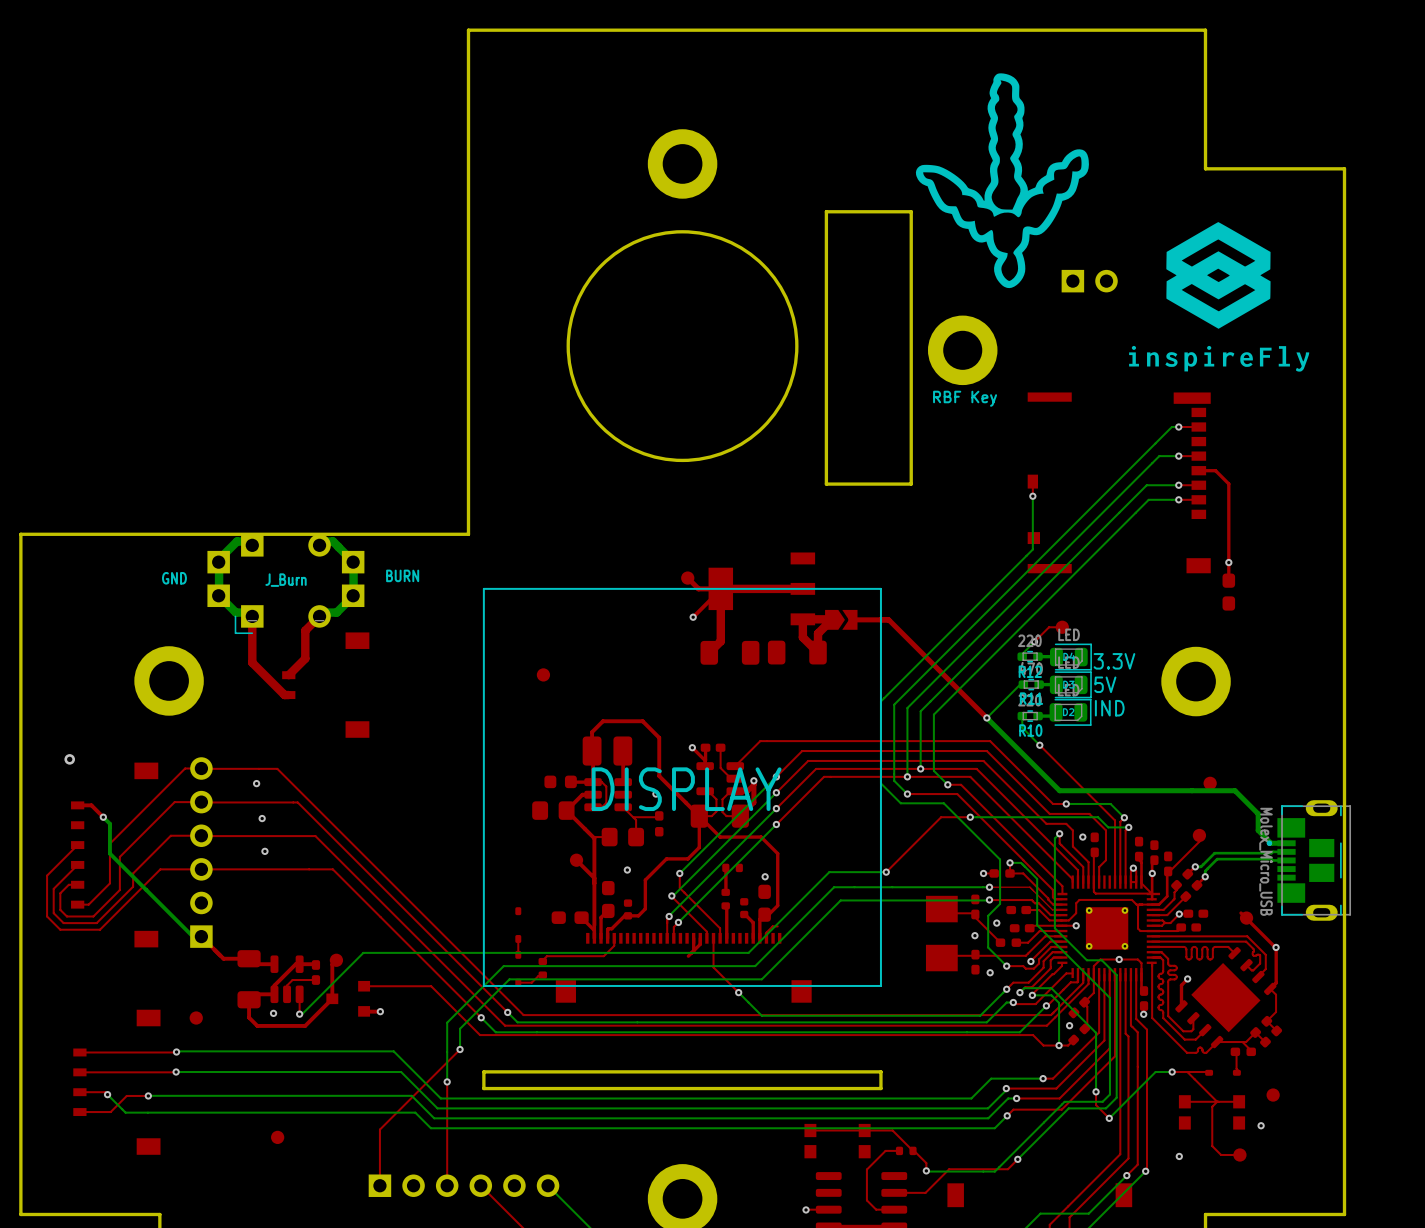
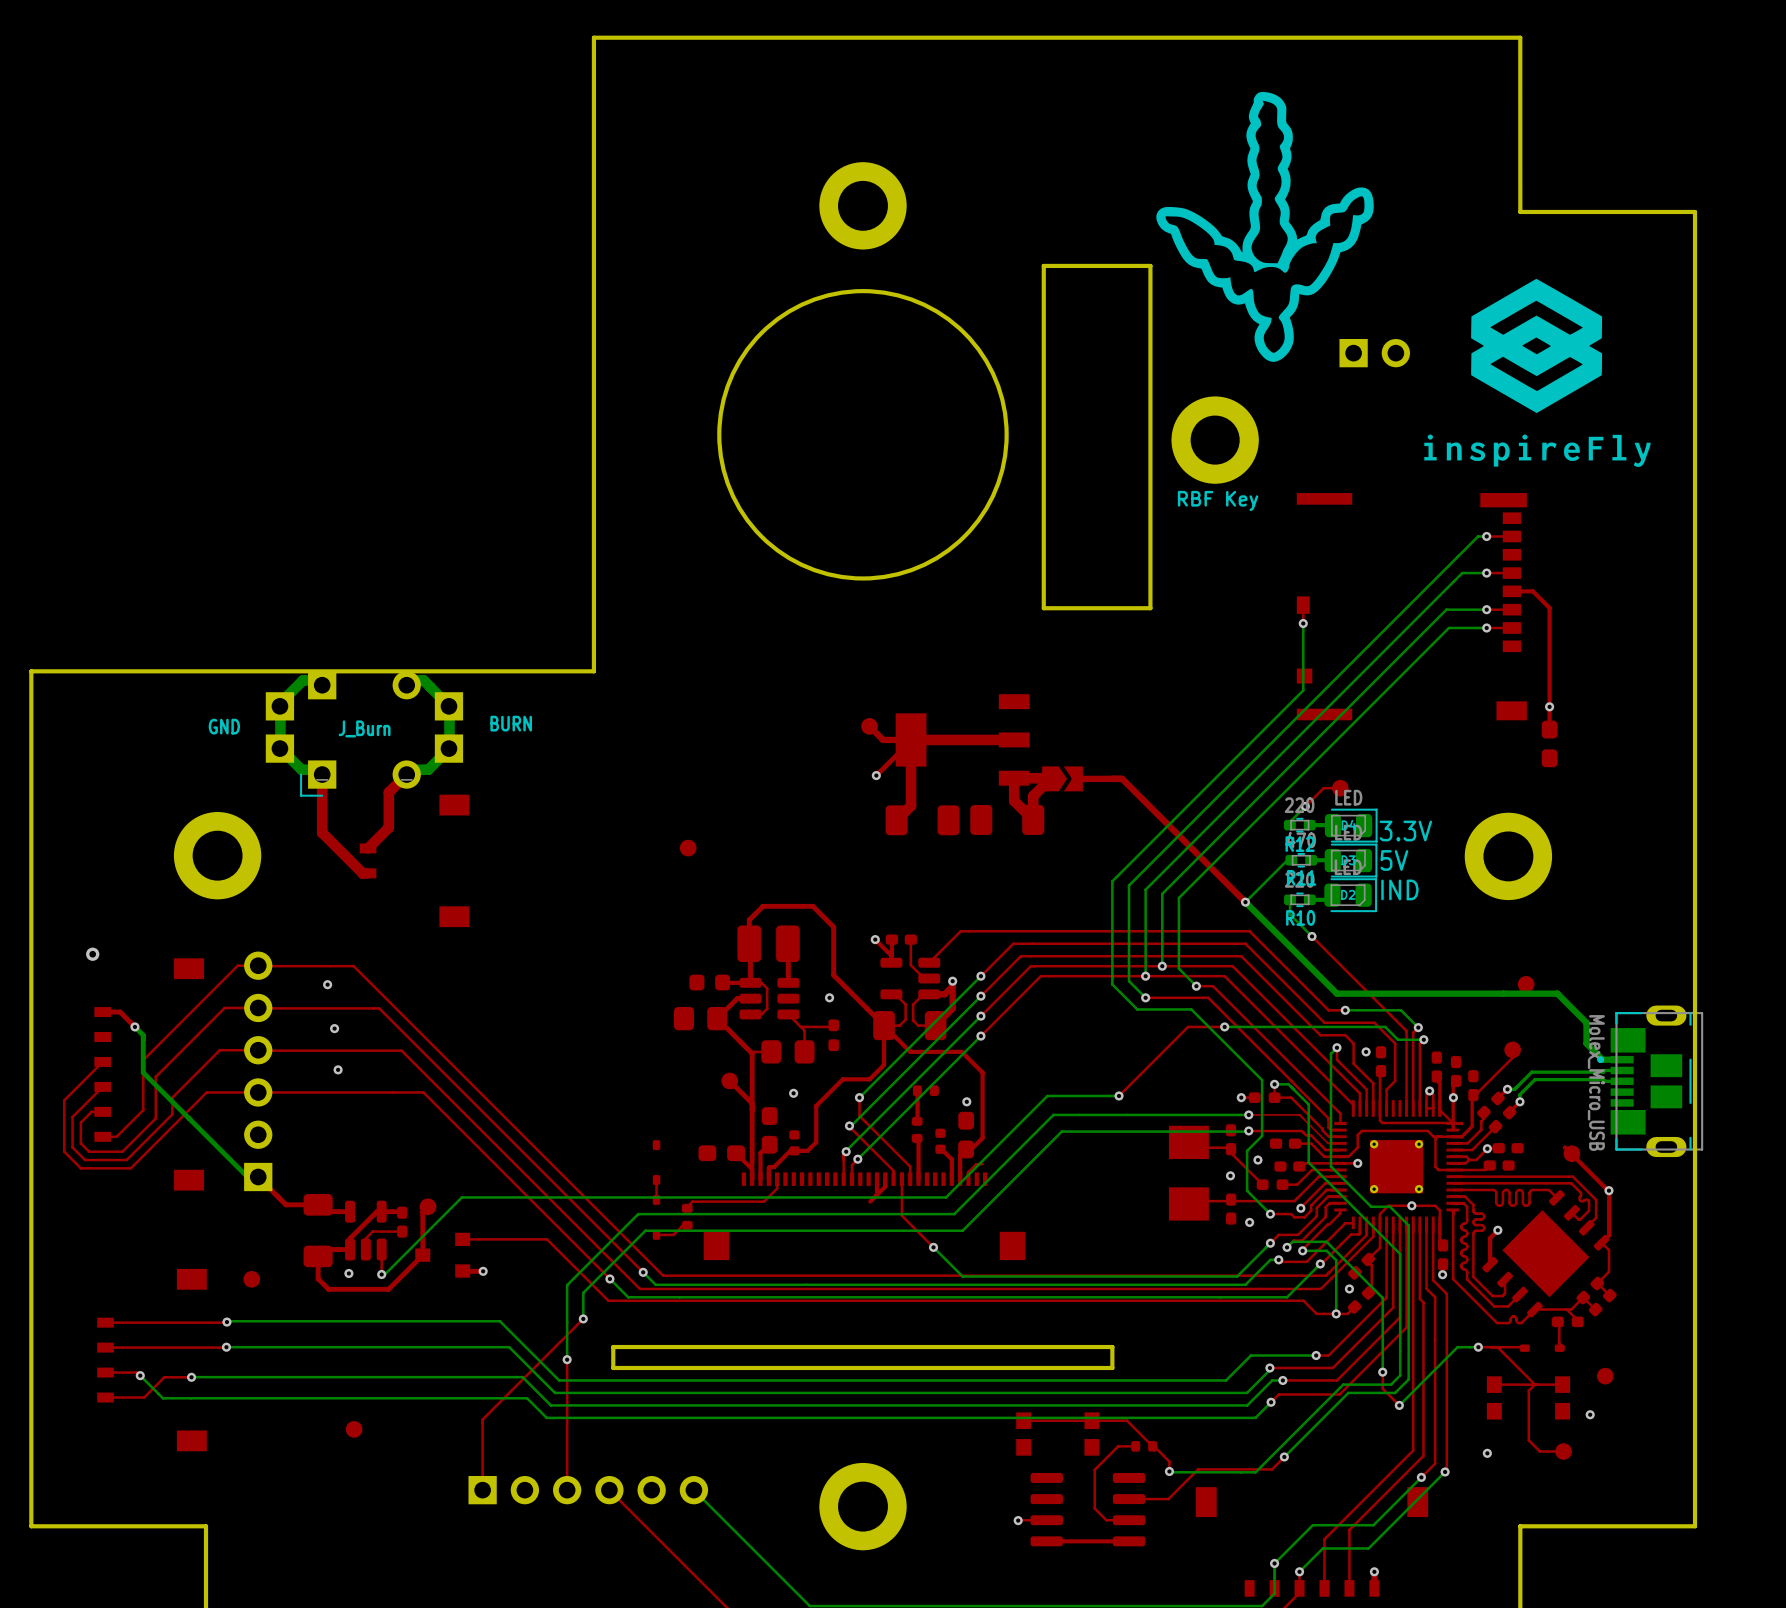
line: (880, 588) (483, 588) (483, 985) (880, 985) (880, 588) -> none
text: DISPLAY (686, 789) -> none

